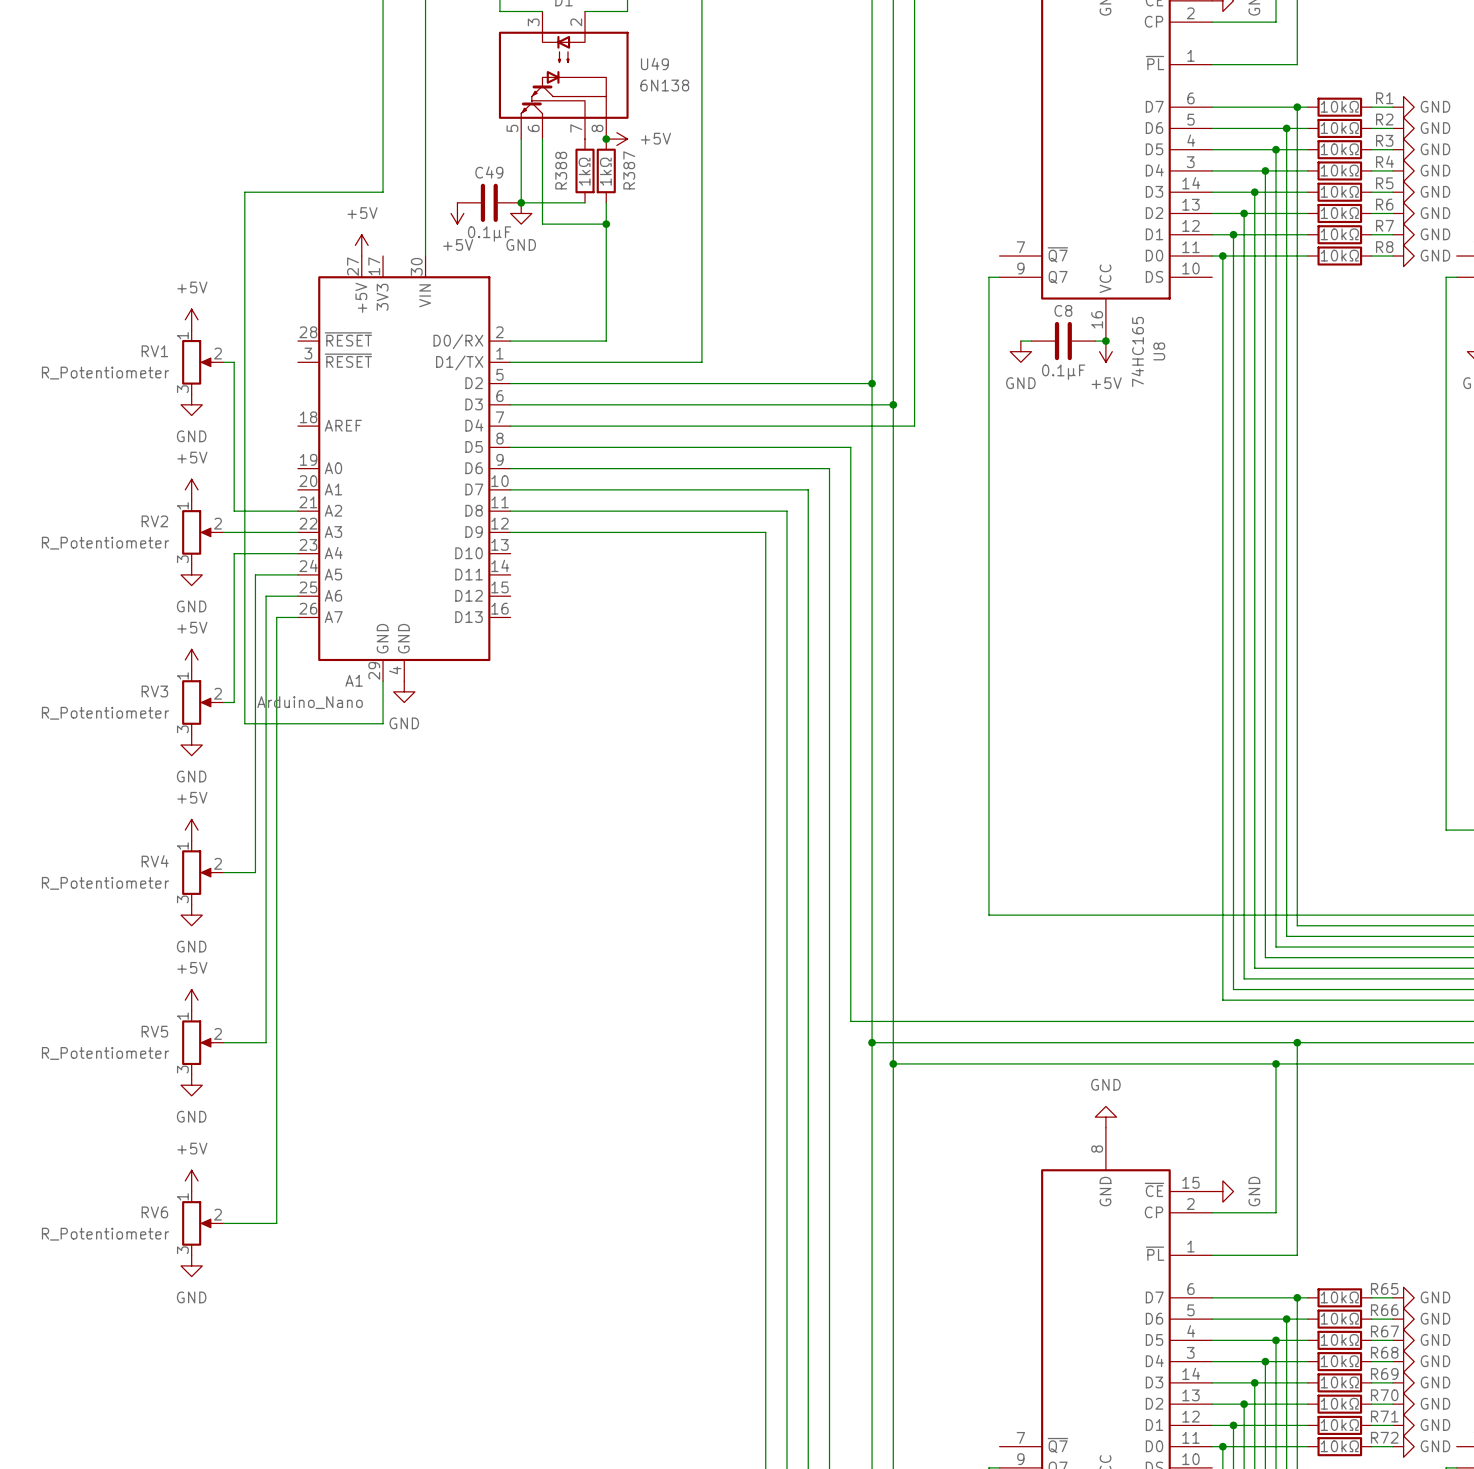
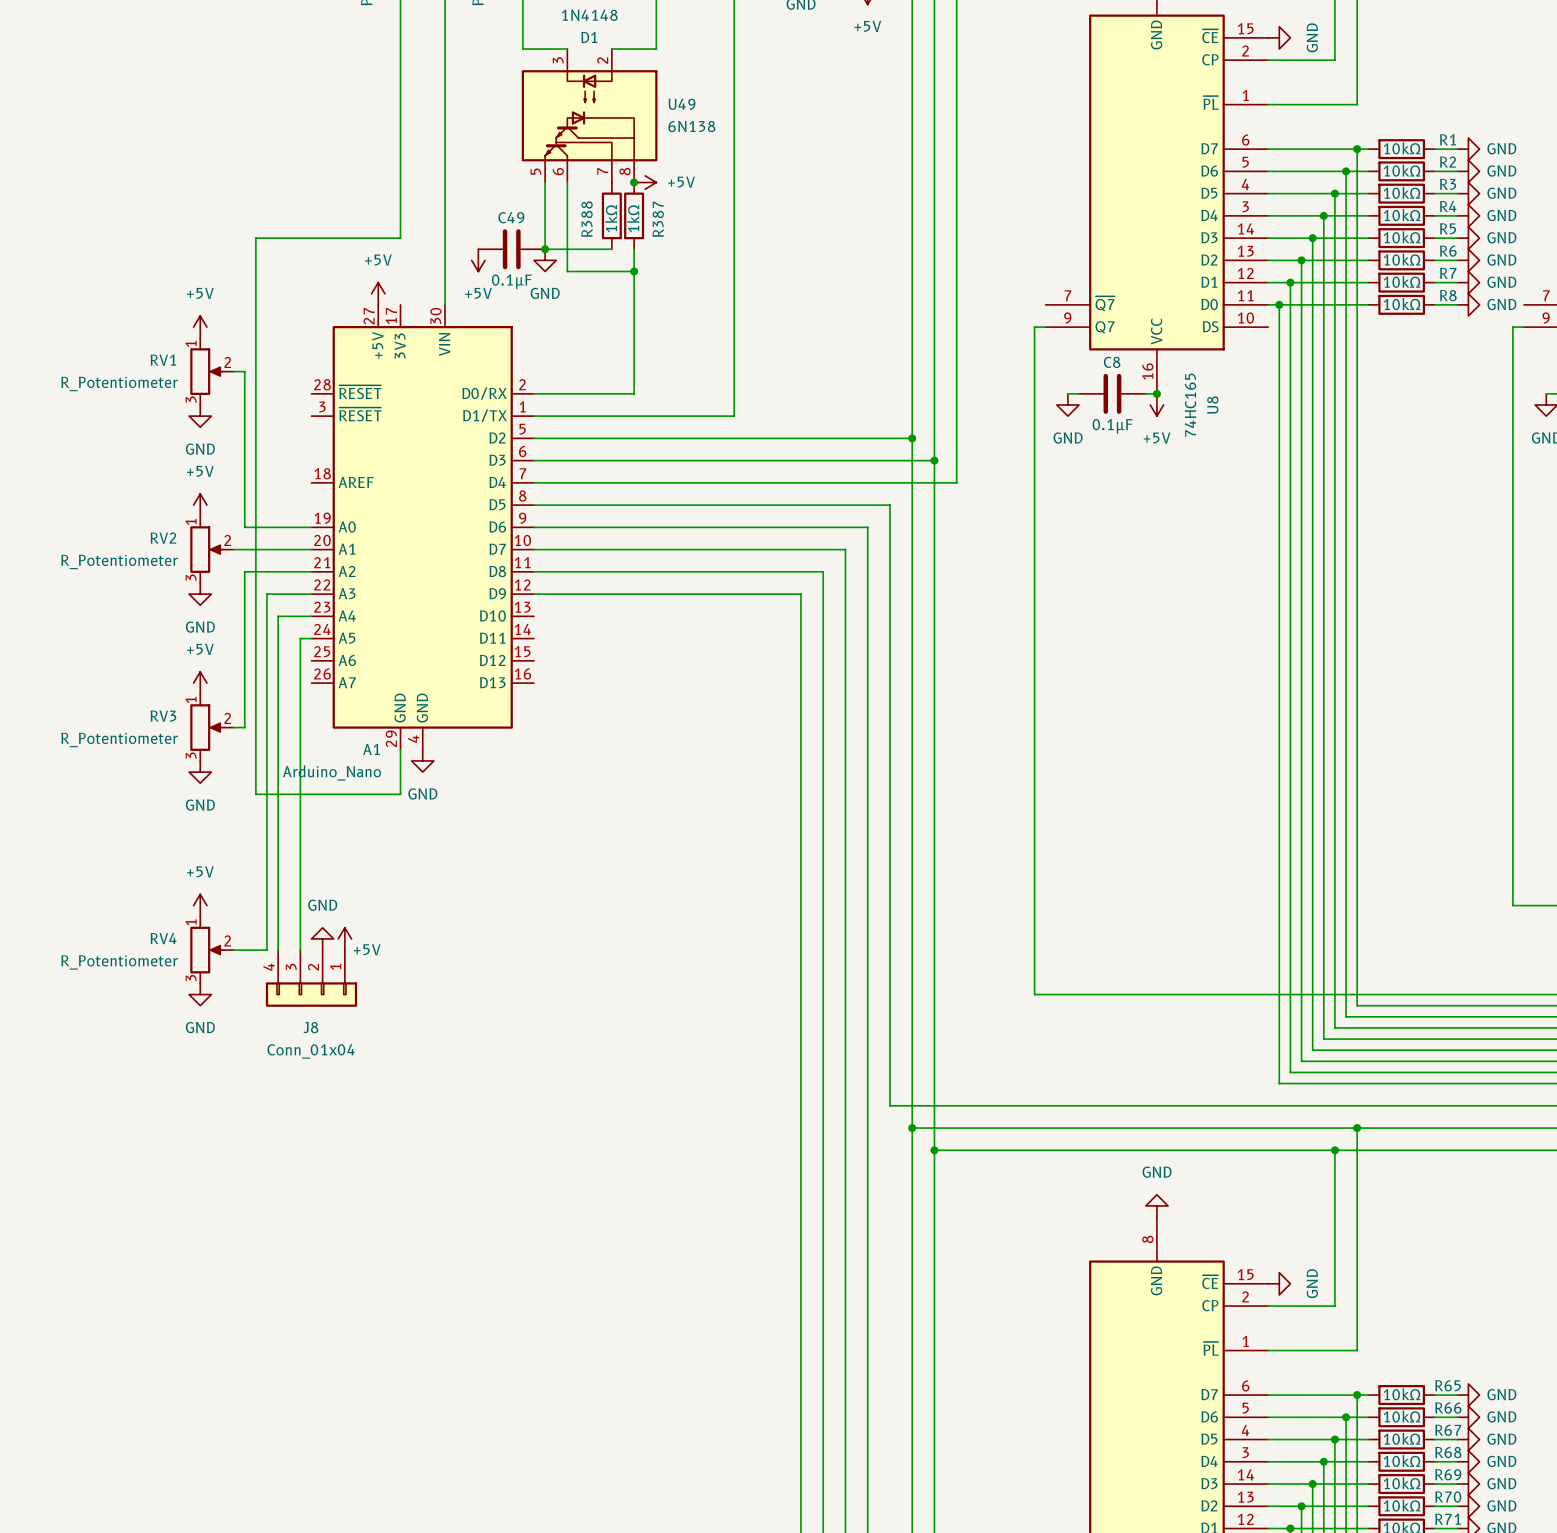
power symbol position: +5V (191, 319) -> +5V (200, 327)
RV1 position: (202, 362) -> (211, 371)
wire: (223, 362) (234, 362) -> (233, 371) (244, 371) (244, 416)
power symbol position: GND (191, 404) -> GND (200, 416)
wire: (234, 468) (234, 511) -> (244, 527) (311, 527)
power symbol position: +5V (191, 489) -> +5V (200, 505)
wire: none -> (233, 549) (311, 549)
RV2 position: (202, 532) -> (211, 549)
wire: (223, 532) (255, 532) -> (267, 638) (267, 594)
wire: (234, 553) (266, 553) -> (244, 616) (244, 571)
power symbol position: GND (191, 574) -> GND (200, 594)
wire: (255, 574) (287, 574) -> (300, 950) (300, 638)
wire: (266, 596) (297, 596) -> (278, 660) (278, 616)
wire: (297, 617) (276, 617) (276, 1223) (223, 1223) -> none
power symbol position: +5V (191, 659) -> +5V (200, 683)
wire: (234, 659) (234, 702) (223, 702) -> (244, 727) (233, 727)
RV3 position: (202, 702) -> (211, 727)
power symbol position: GND (191, 745) -> GND (200, 772)
power symbol: none -> GND (322, 938)
power symbol: none -> +5V (344, 938)
wire: (266, 872) (266, 1042) (223, 1042) -> none
J8: none -> Conn_01x04 (311, 978)
power symbol: +5V (191, 1000) -> none
RV5: R_Potentiometer (202, 1042) -> none
power symbol: GND (191, 1085) -> none
power symbol: +5V (191, 1180) -> none
RV6: R_Potentiometer (202, 1223) -> none
power symbol: GND (191, 1265) -> none

